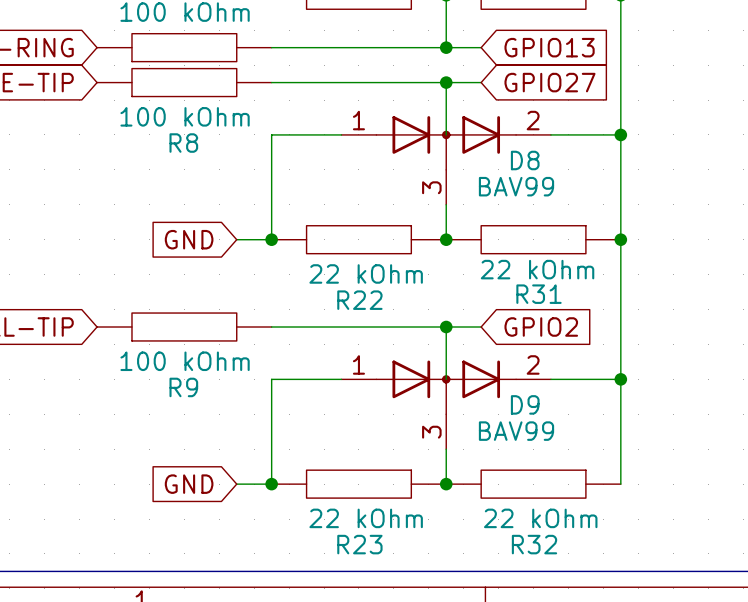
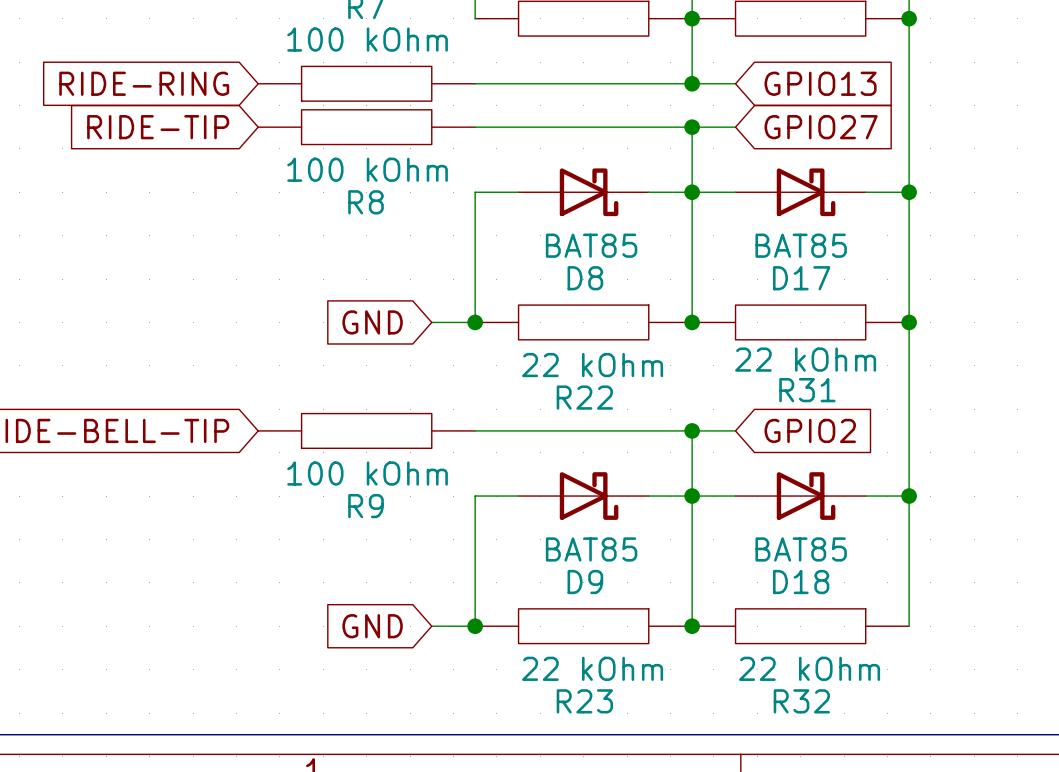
D8 symbol: [341, 116, 551, 205] -> [518, 168, 649, 217]
junction: none -> (692, 192)
D17: none -> BAT85 (800, 192)
D8 name position: D8 (525, 160) -> D8 (585, 278)
D8 value: BAV99 (516, 186) -> BAT85 (591, 245)
D9 symbol: [341, 360, 551, 450] -> [518, 472, 649, 520]
junction: none -> (692, 496)
D18: none -> BAT85 (800, 496)
D9 name position: D9 (525, 404) -> D9 (585, 582)
D9 value: BAV99 (516, 431) -> BAT85 (591, 549)

